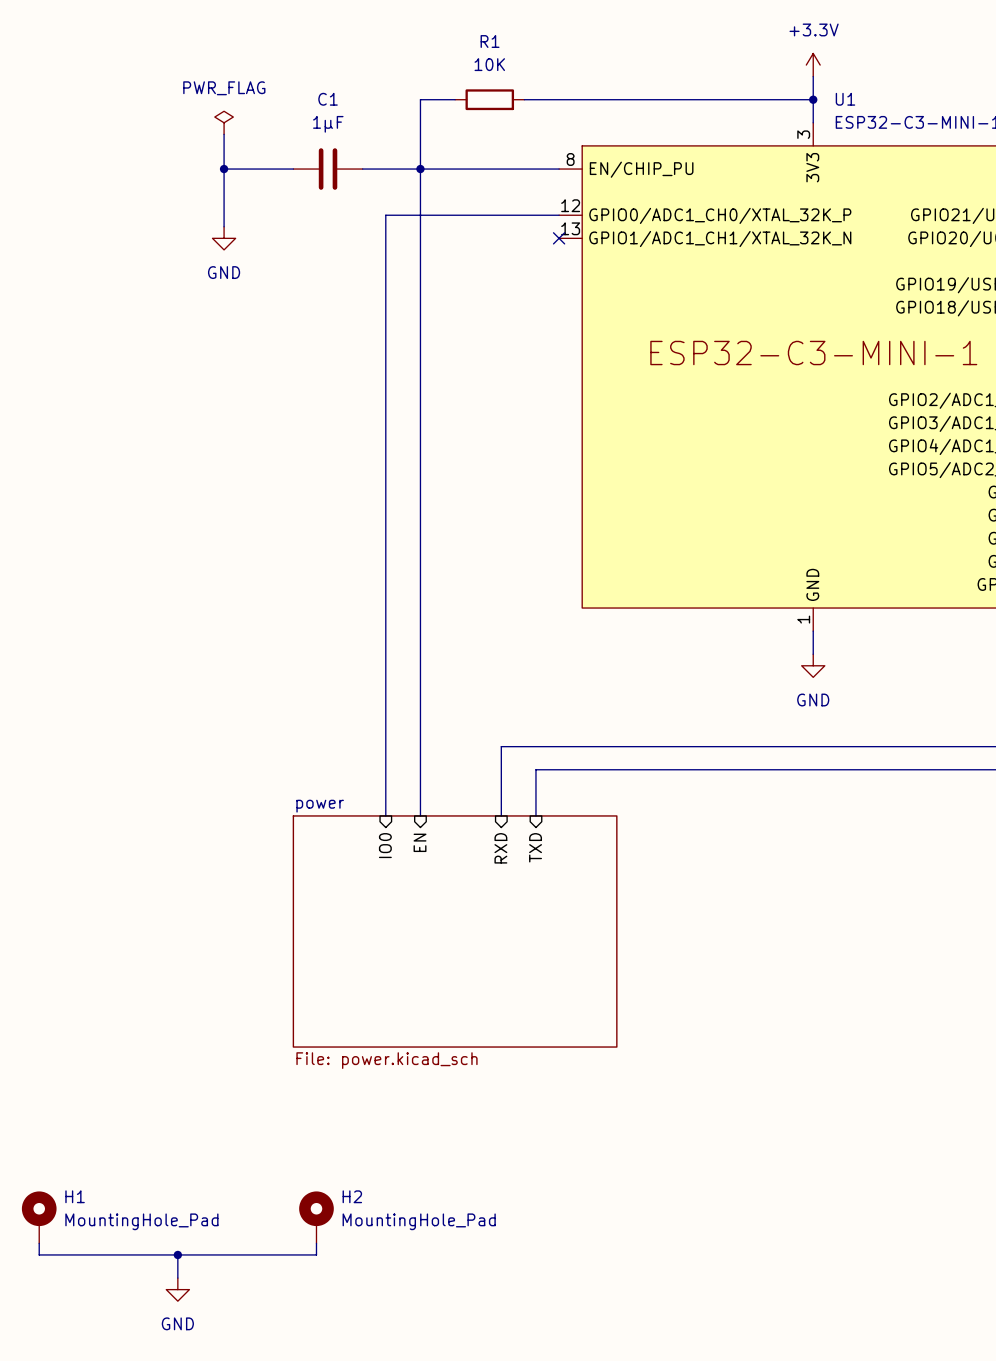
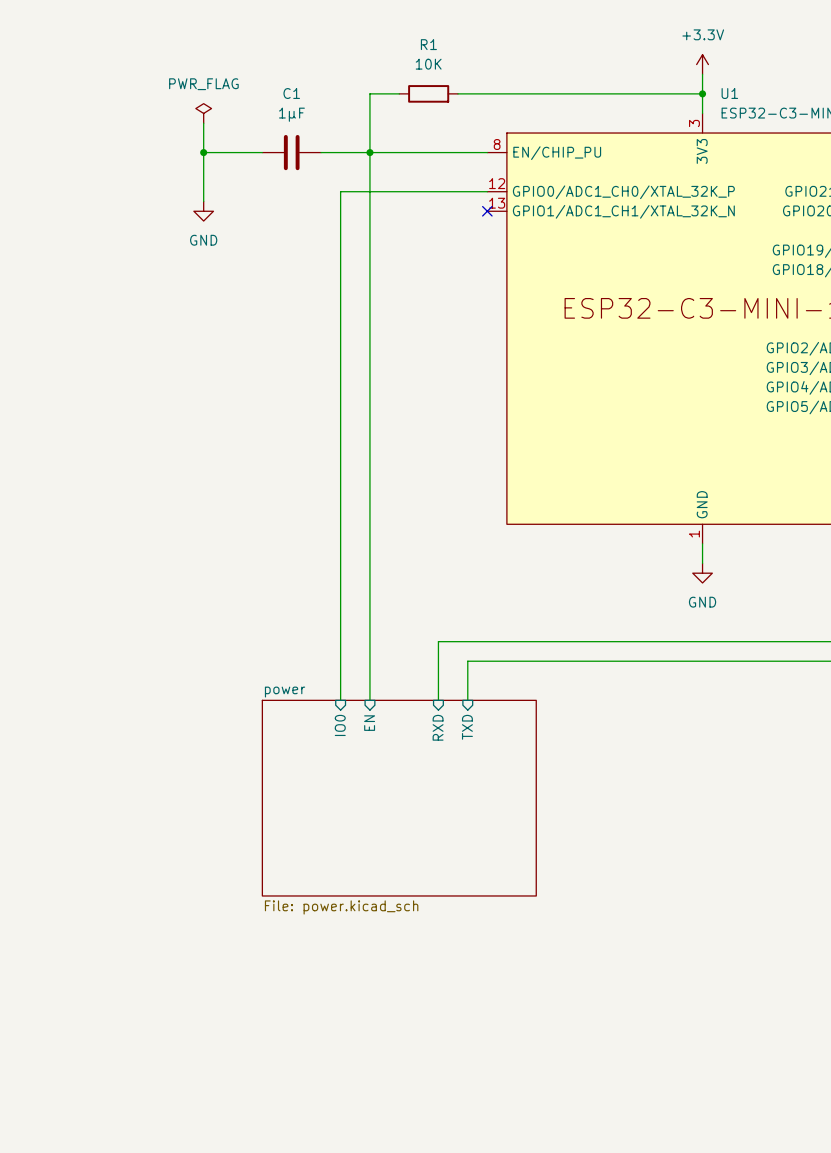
H1: MountingHole_Pad (39, 1217) -> none
H2: MountingHole_Pad (316, 1217) -> none
wire: (39, 1243) (39, 1254) (316, 1254) (316, 1243) -> none
wire: (177, 1254) (177, 1278) -> none
junction: (177, 1254) -> none
power symbol: GND (177, 1289) -> none

